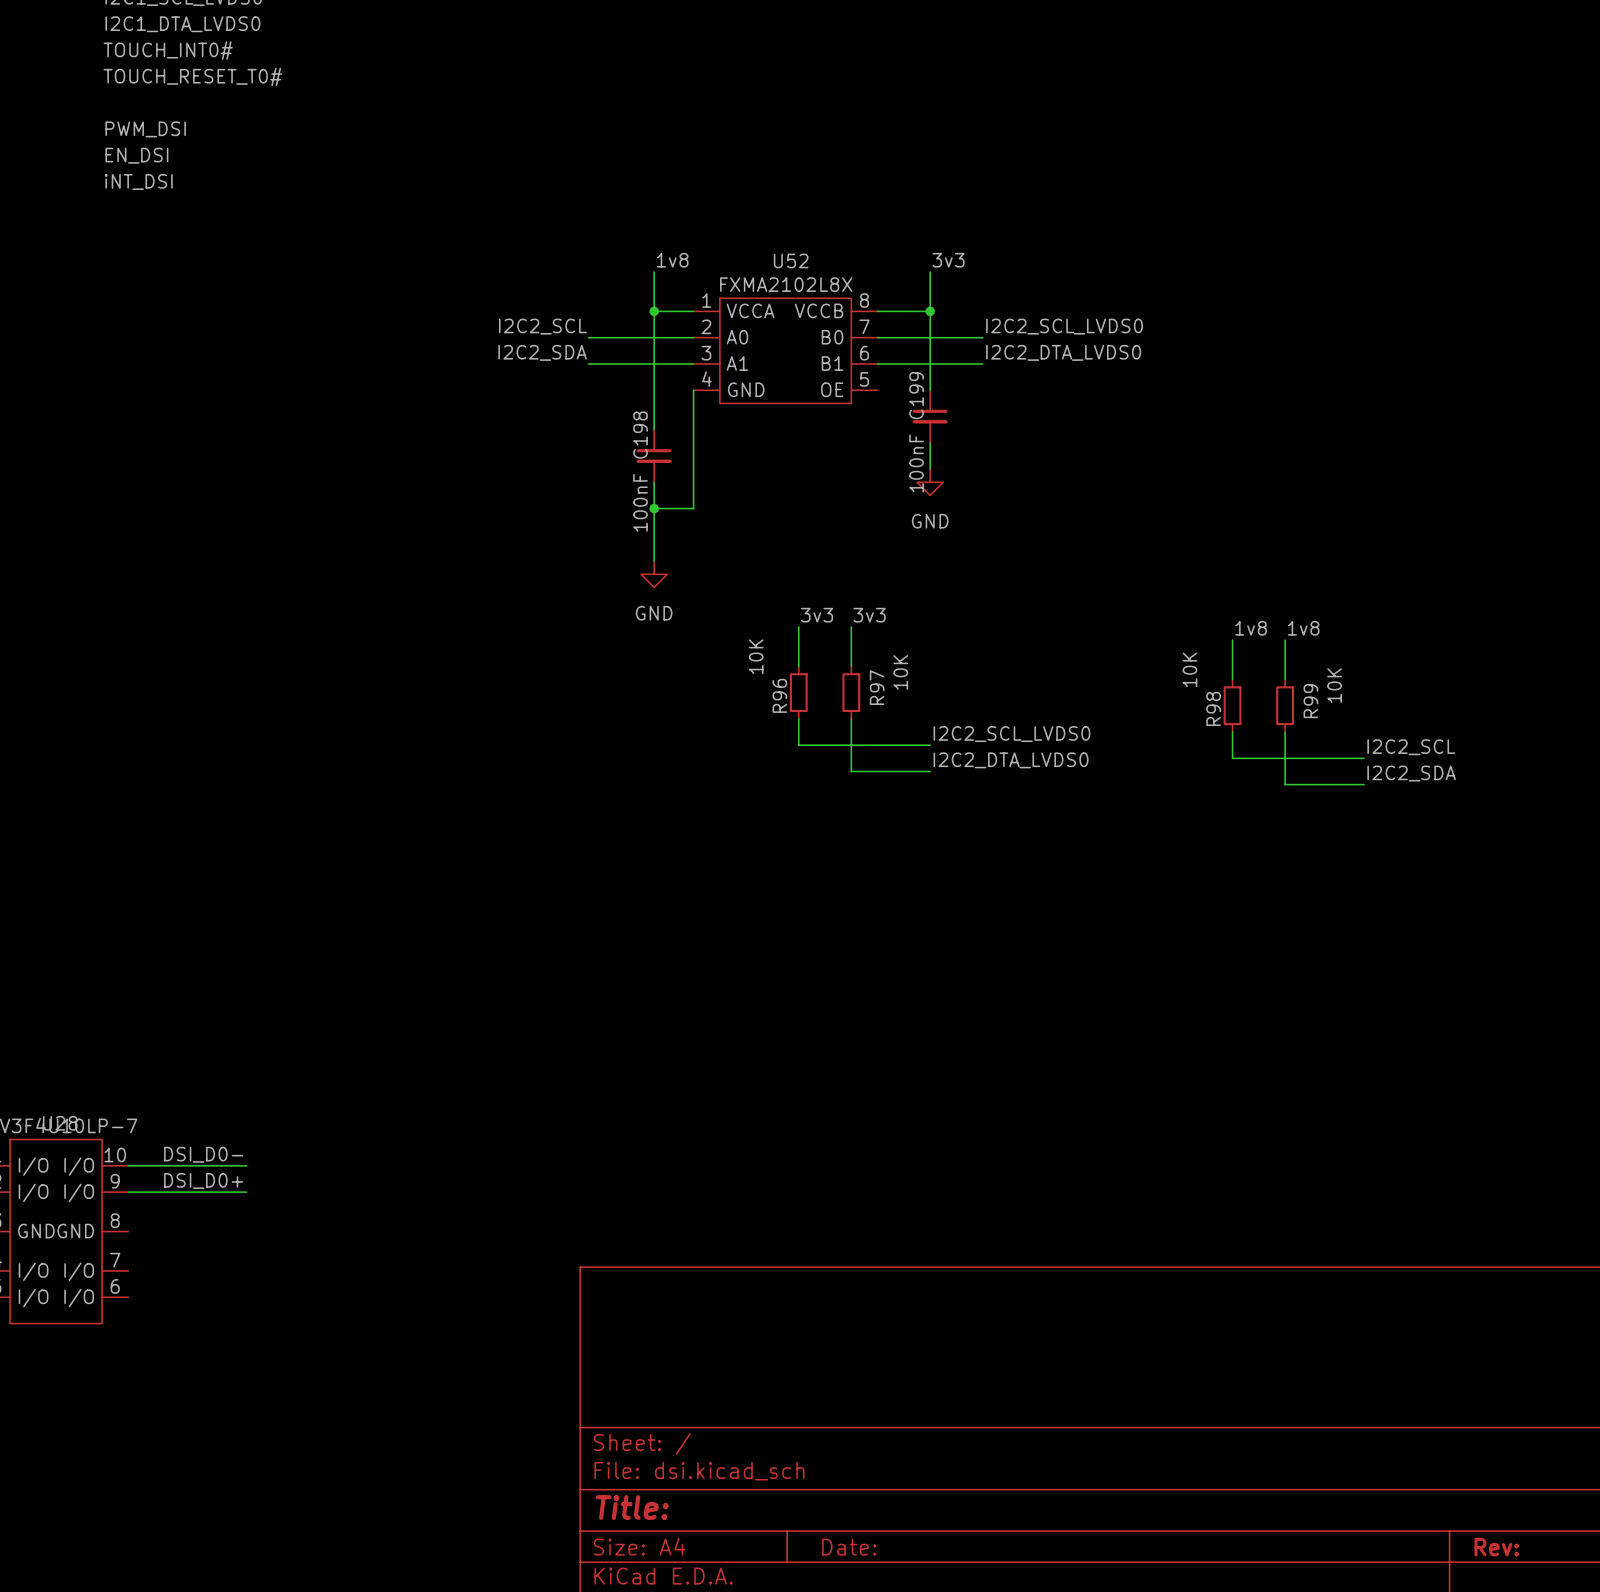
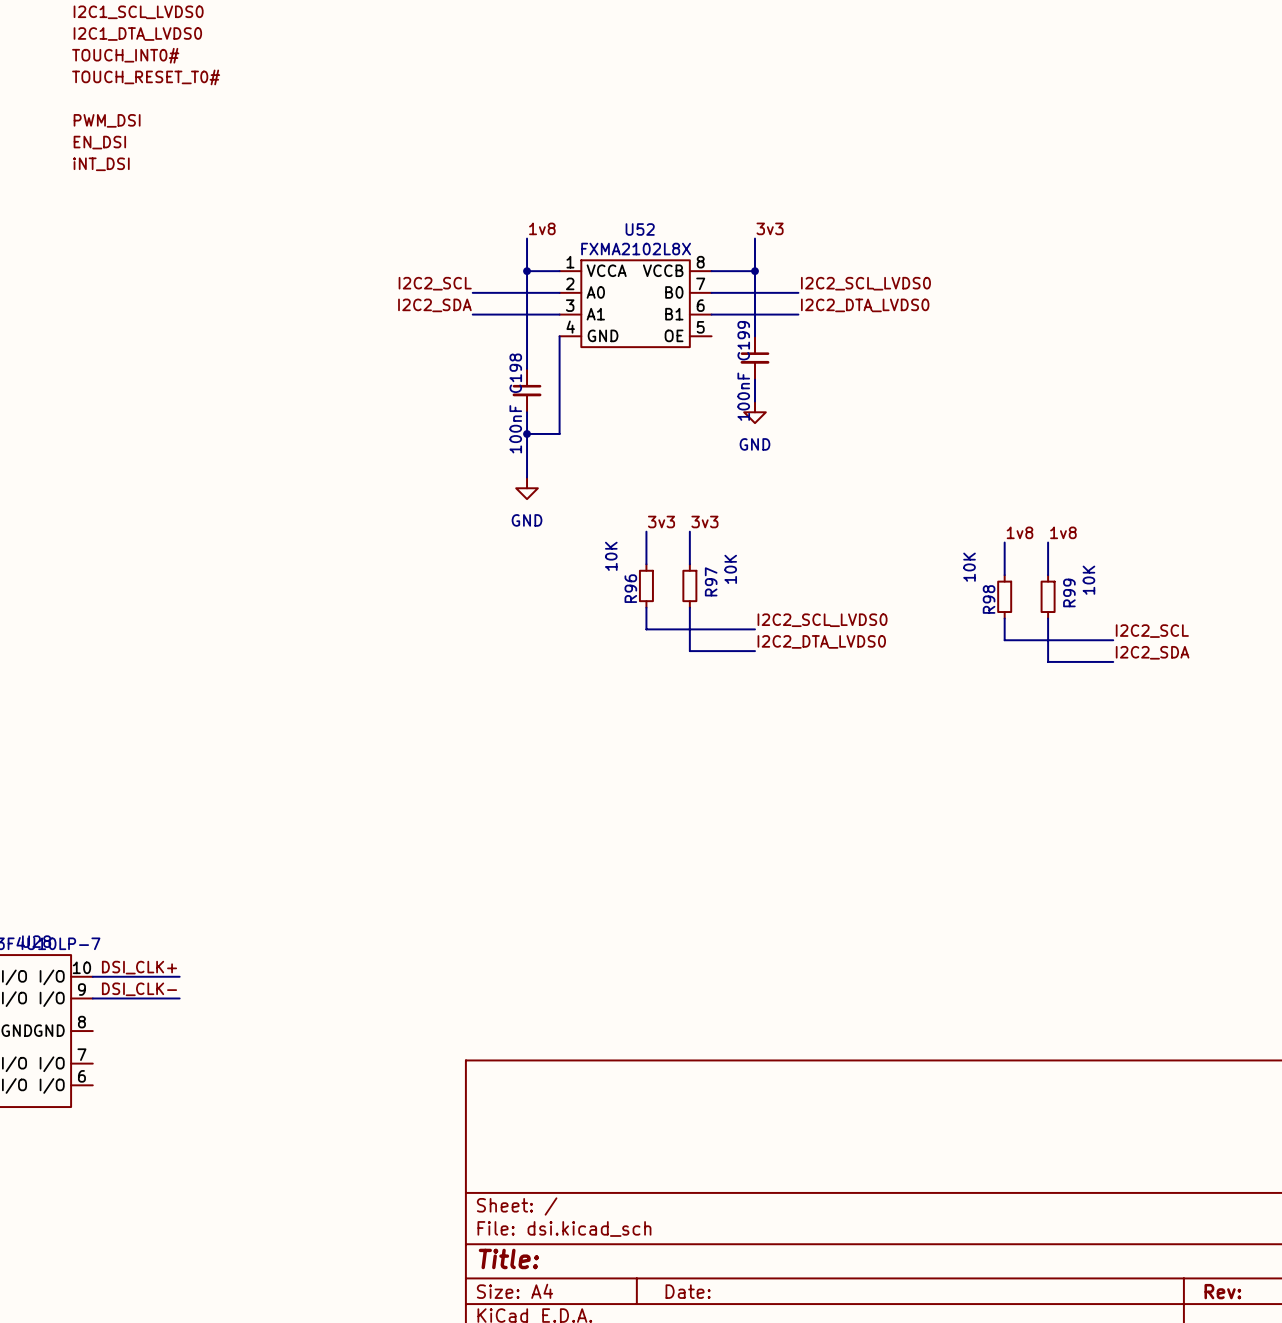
label: DSI_D0- (203, 1154) -> DSI_CLK- (139, 989)
wire: (233, 1165) (246, 1165) -> none
label: DSI_D0+ (203, 1181) -> DSI_CLK+ (139, 967)
wire: (233, 1192) (246, 1192) -> none

